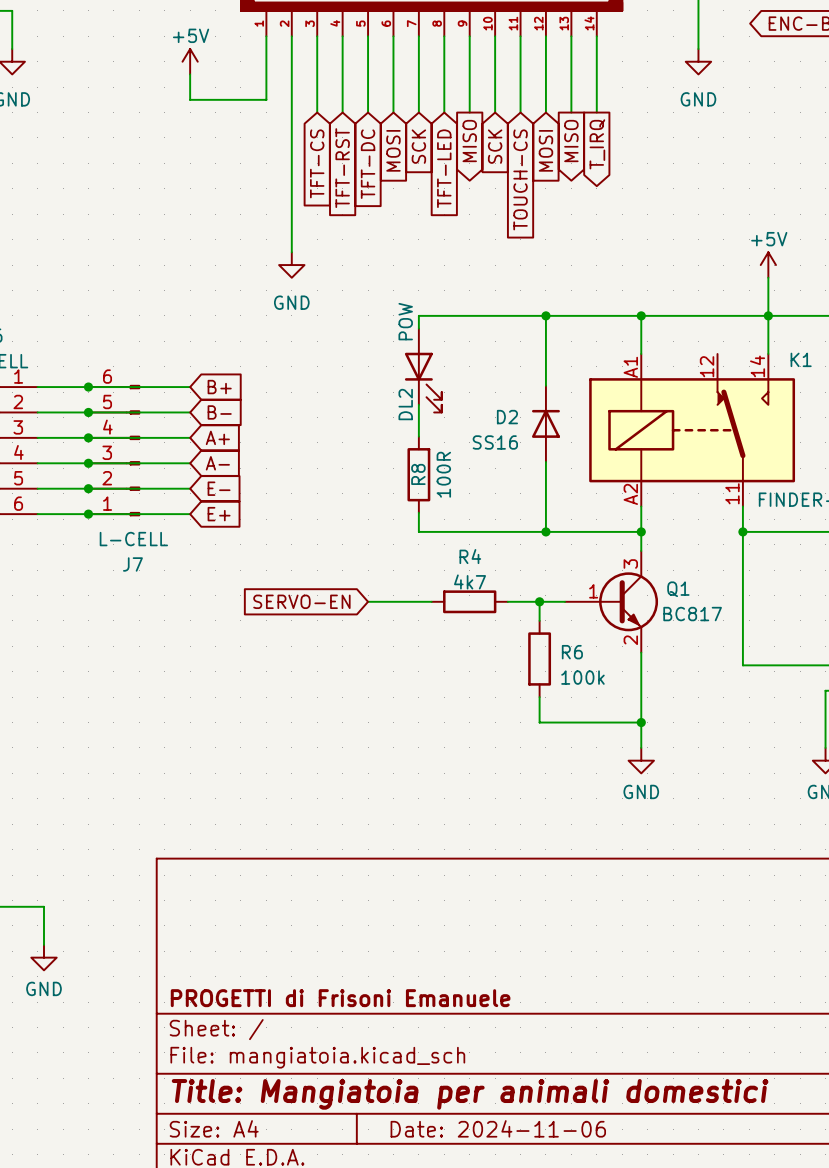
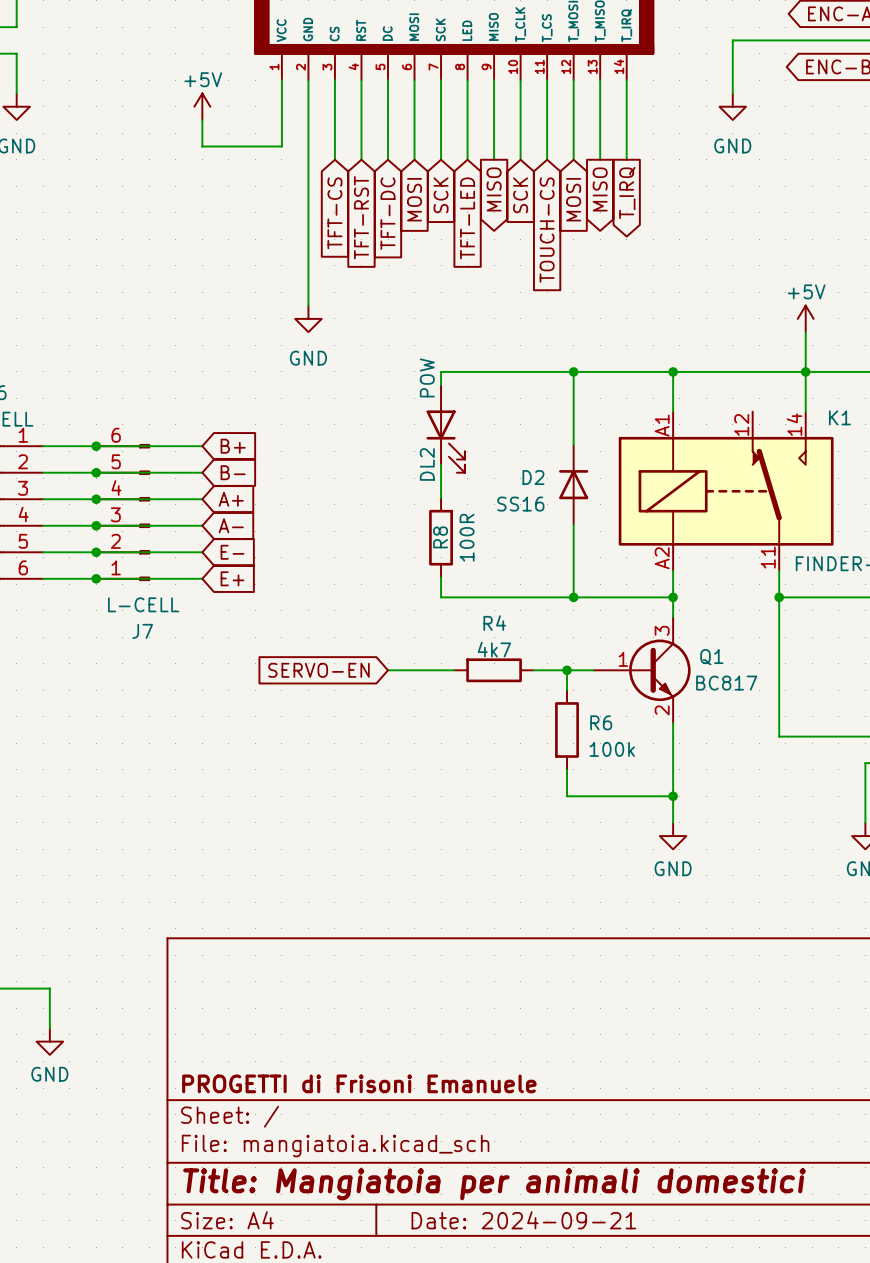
title block: Date: 2024-11-06 (498, 1128) -> Date: 2024-09-21 (523, 1220)

